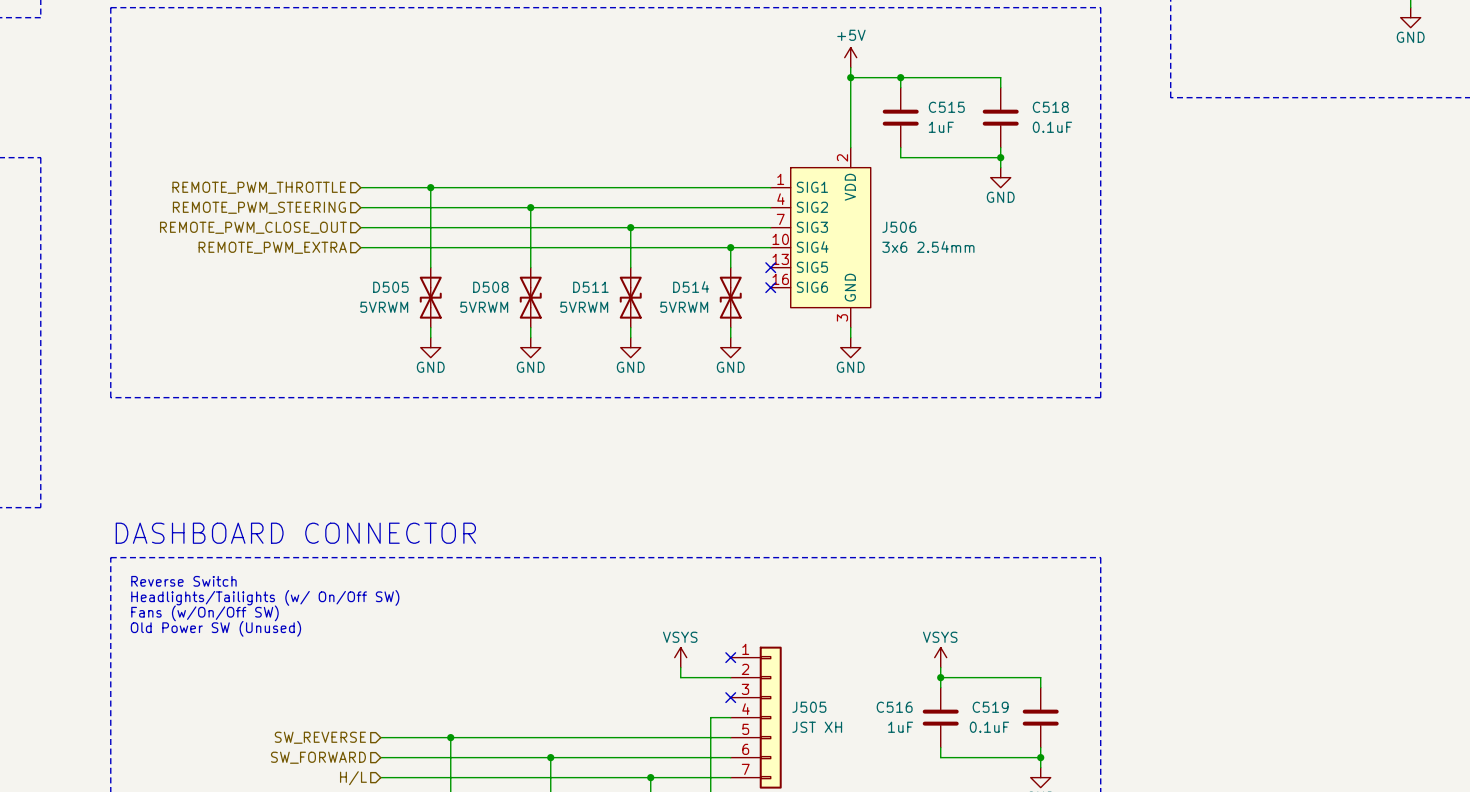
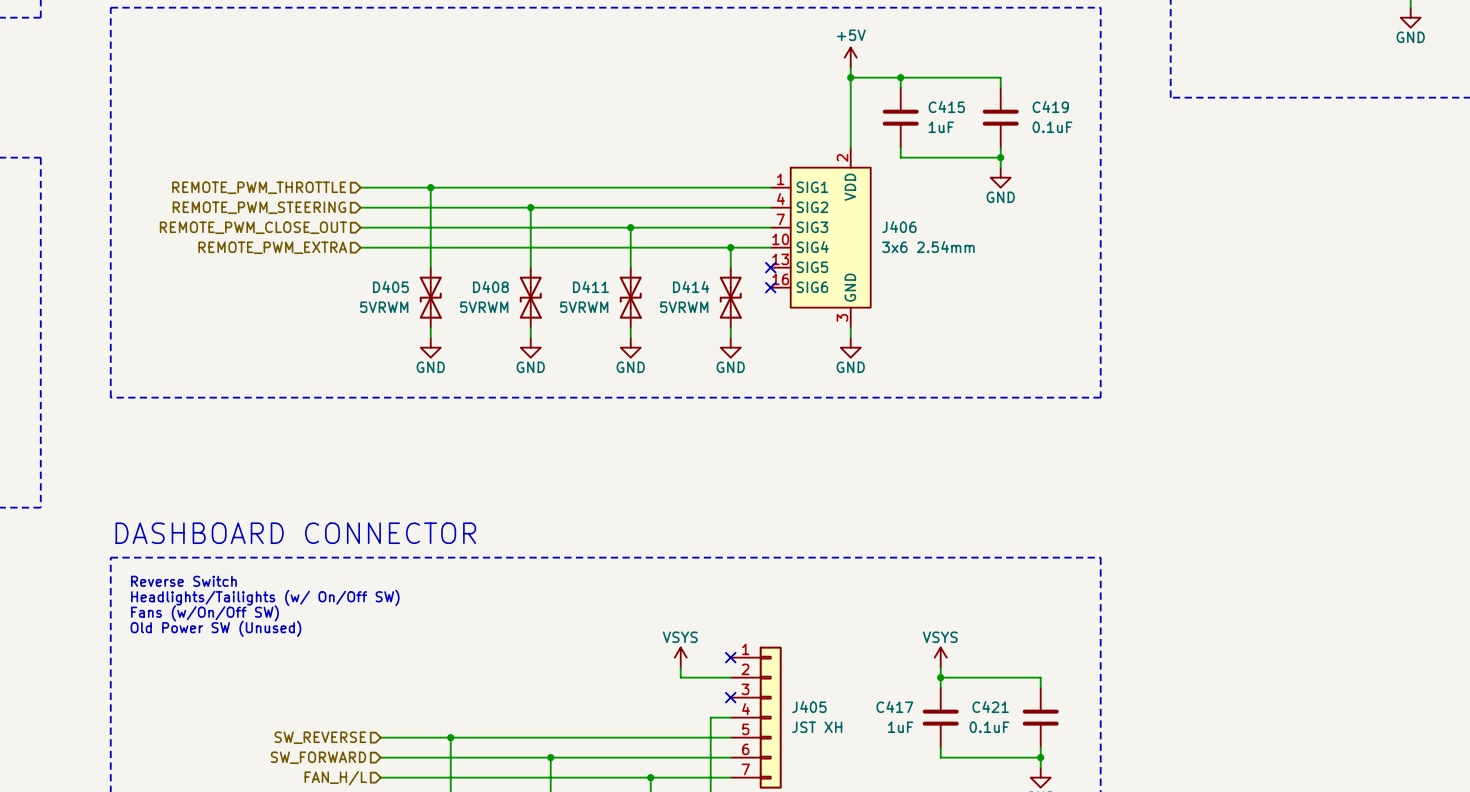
C515 name: C515 (946, 107) -> C415 (946, 107)
C518 name: C518 (1050, 107) -> C419 (1050, 107)
J506 name: J506 (899, 227) -> J406 (899, 227)
D505 name: D505 (390, 287) -> D405 (390, 287)
D508 name: D508 (490, 287) -> D408 (490, 287)
D511 name: D511 (590, 287) -> D411 (590, 287)
D514 name: D514 (691, 287) -> D414 (691, 287)
J505 name: J505 (809, 707) -> J405 (809, 707)
C516 name: C516 (894, 707) -> C417 (894, 707)
C519 name: C519 (990, 707) -> C421 (990, 707)
hierarchical label: H/L (353, 778) -> FAN_H/L (335, 778)

